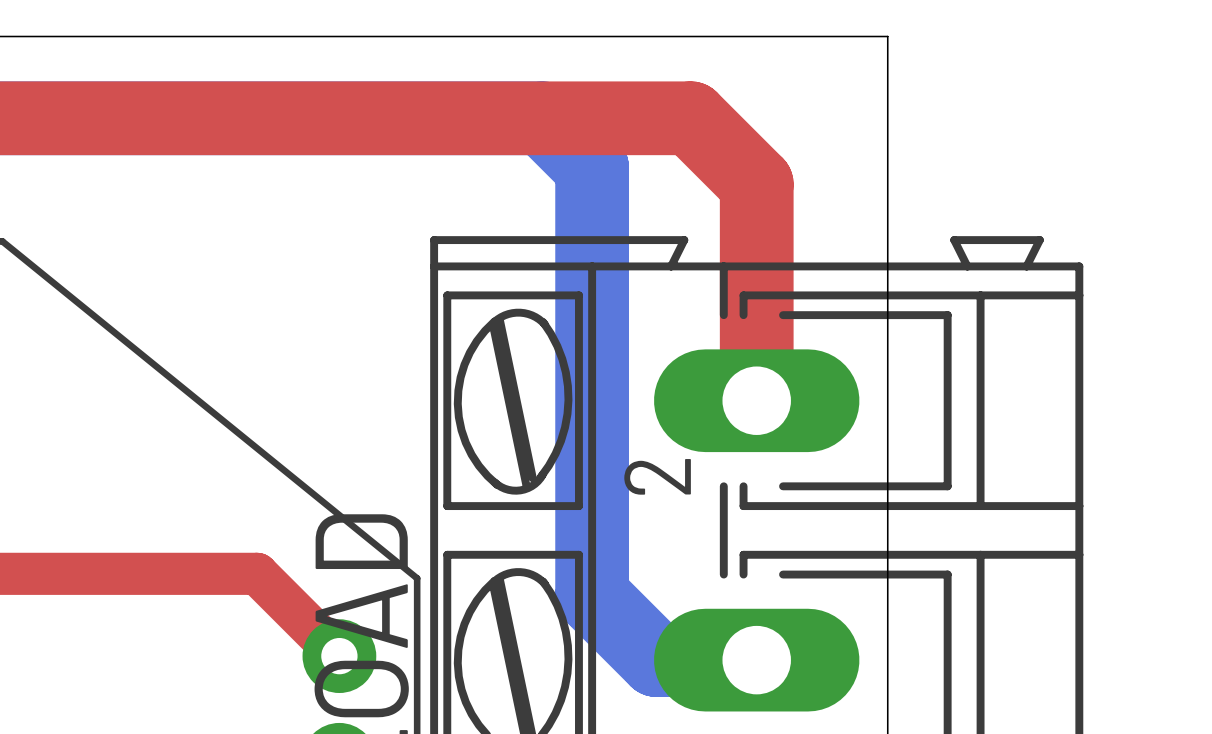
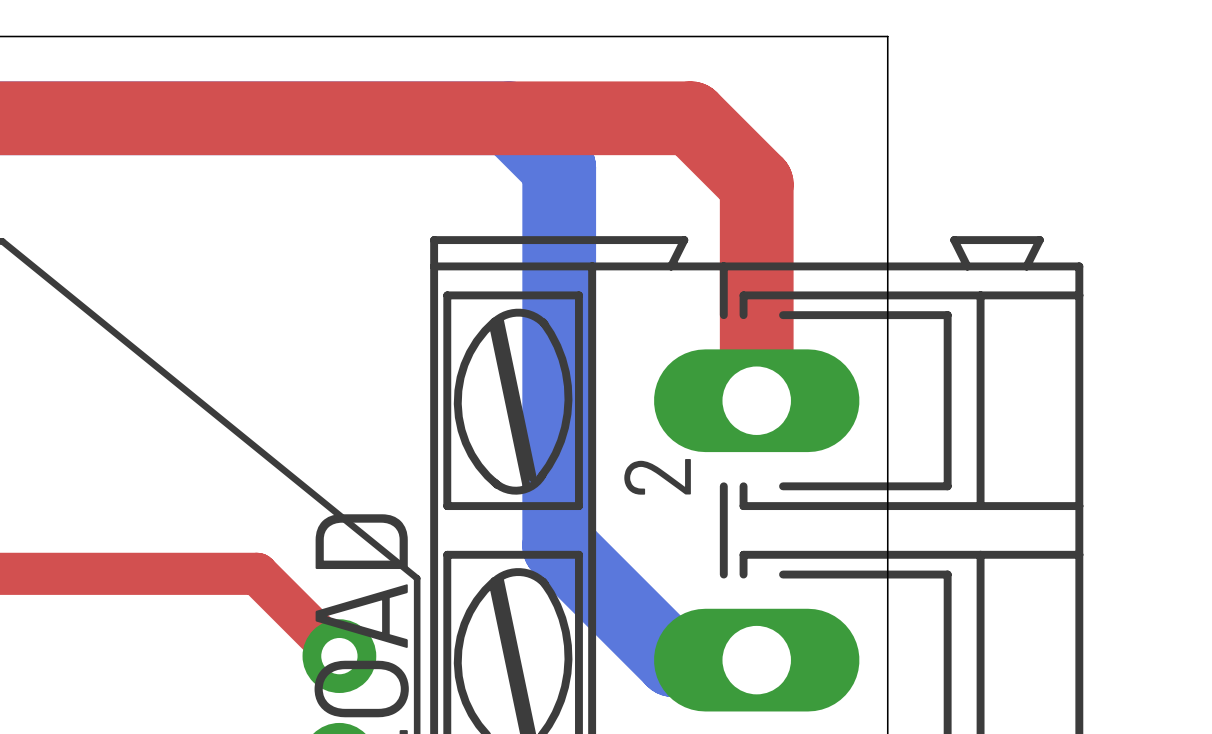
bottom track: (509, 118) (542, 118) (592, 167) (592, 595) (656, 660) (673, 660) -> (509, 118) (559, 167) (559, 546) (673, 660)

